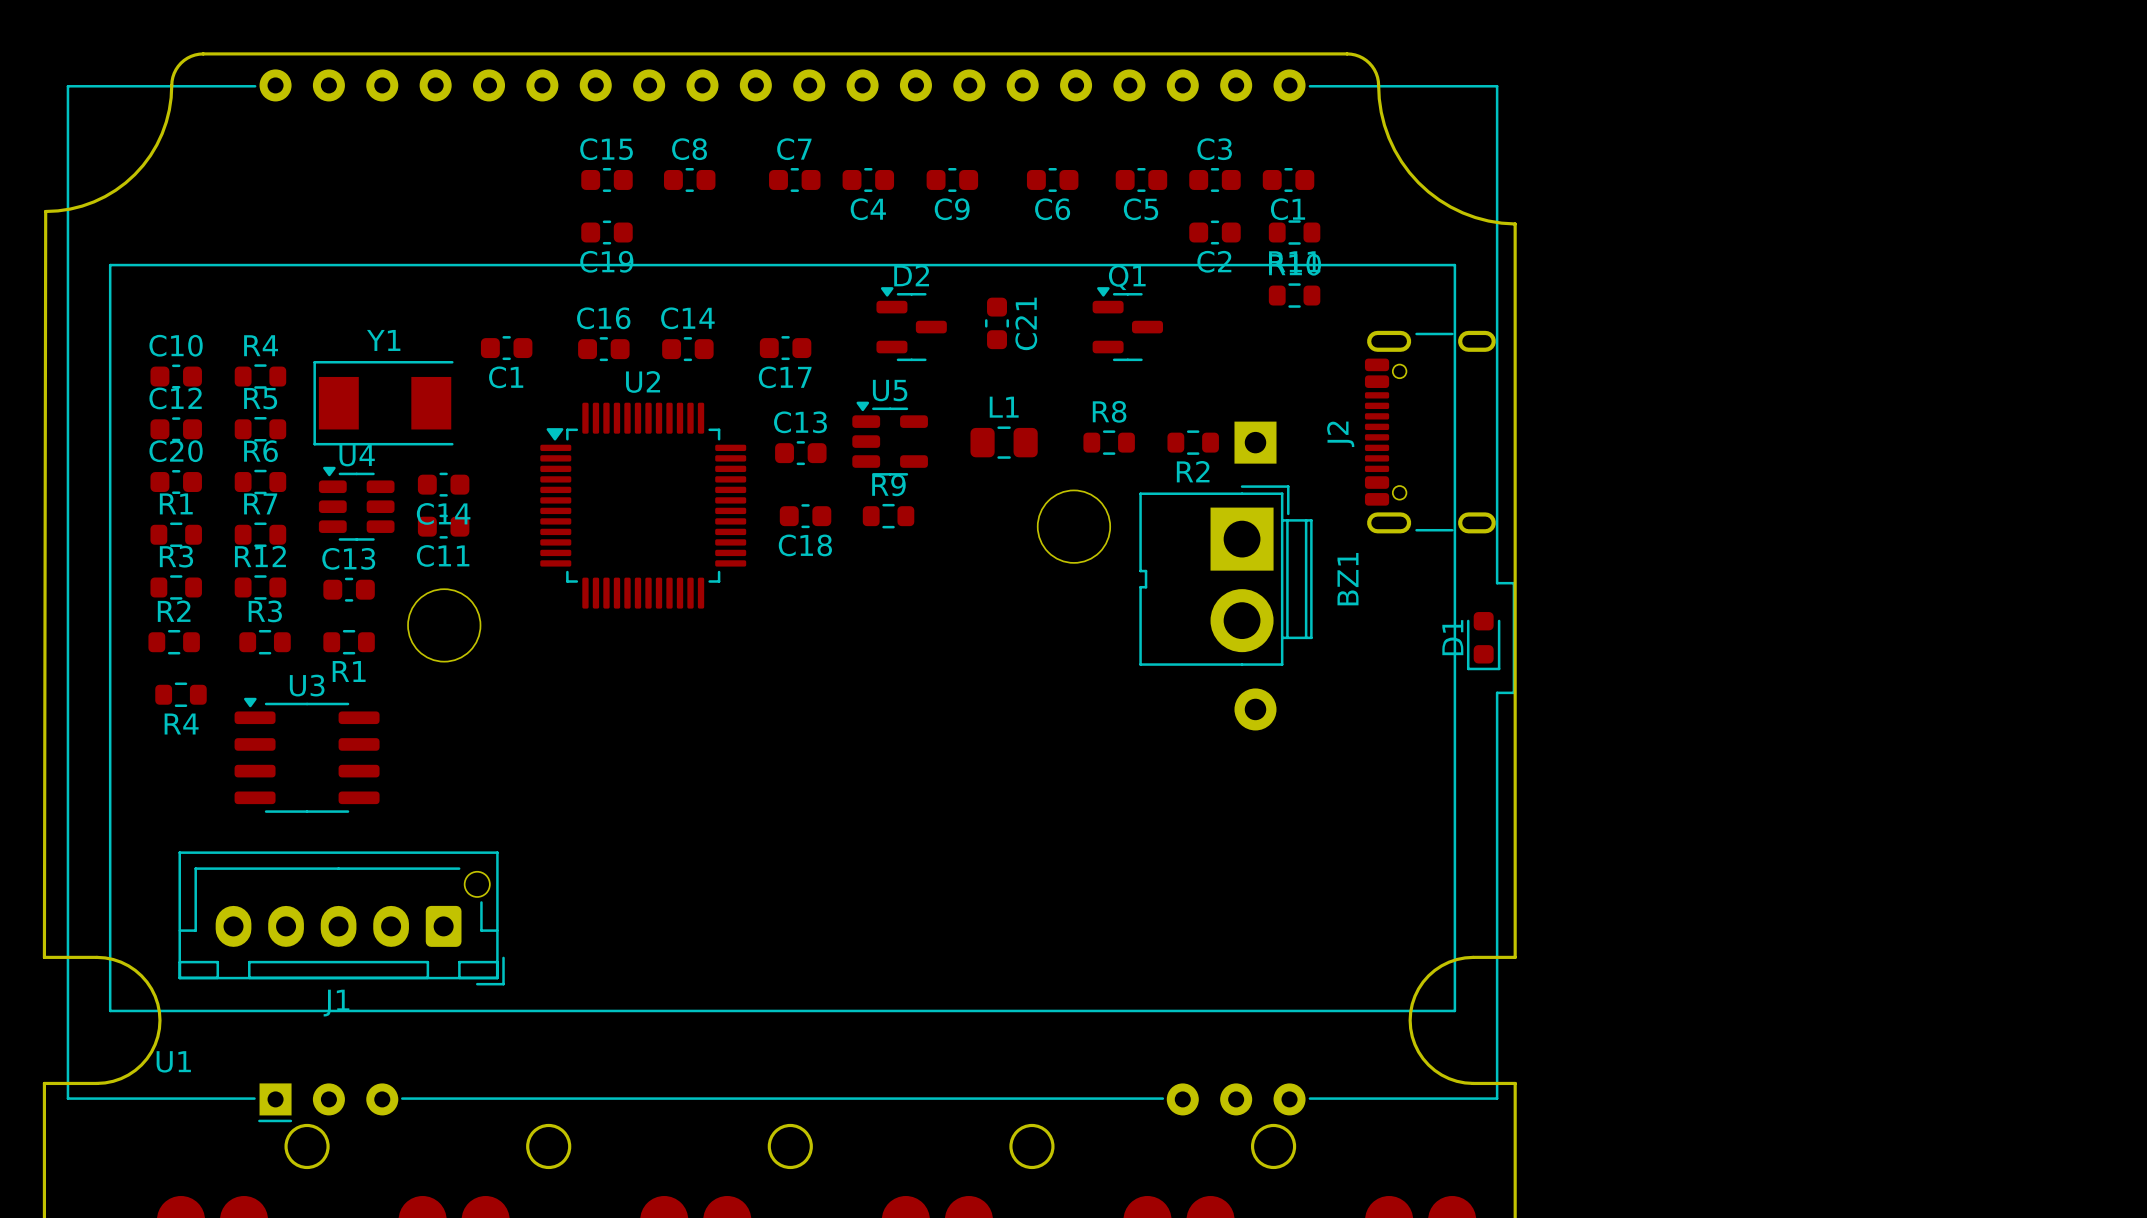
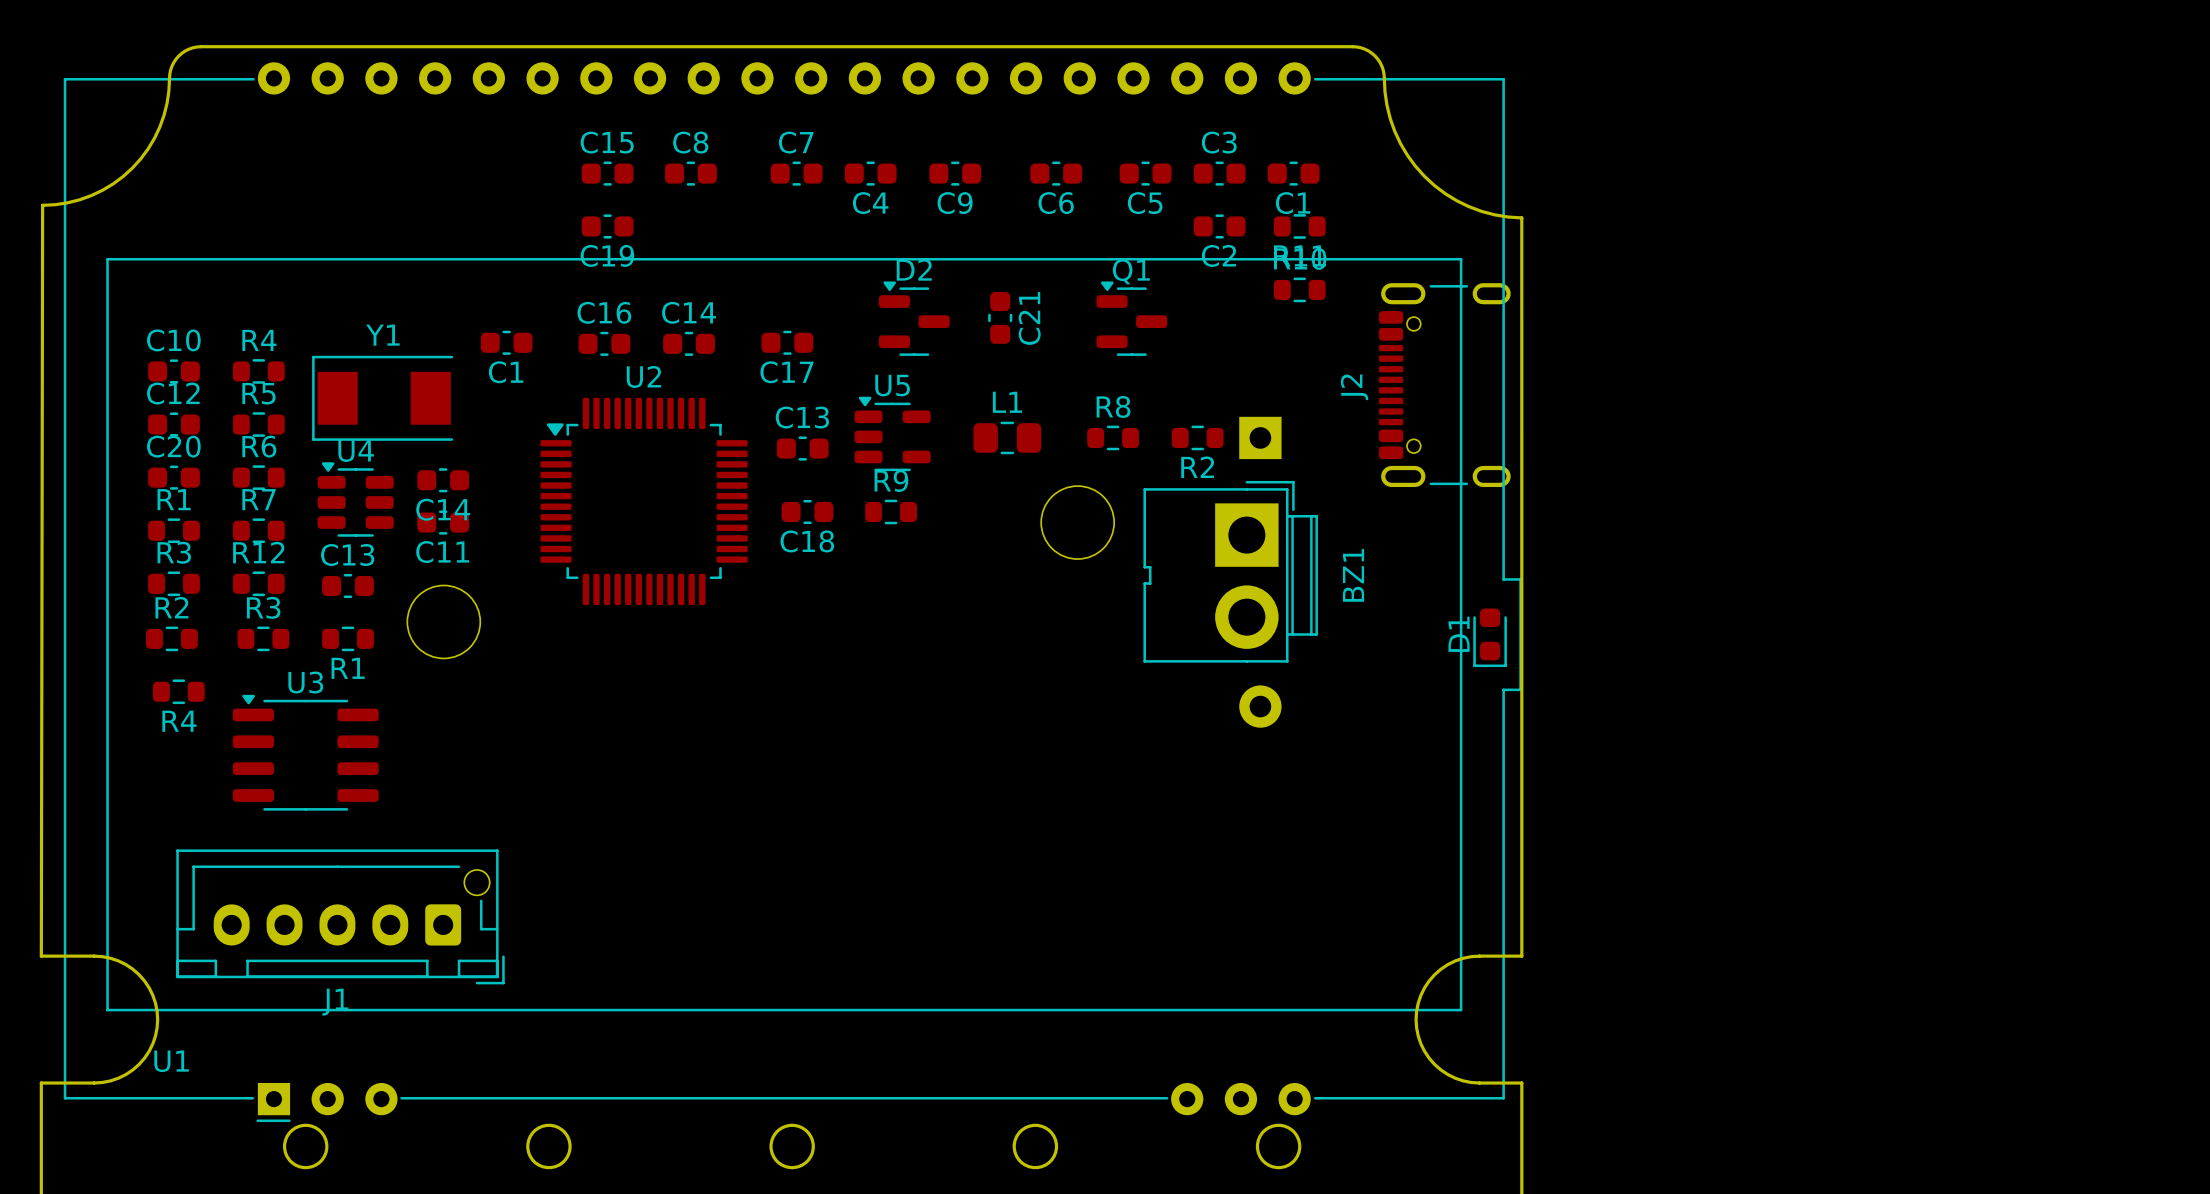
J2 position: (1430, 432) -> (1444, 385)

